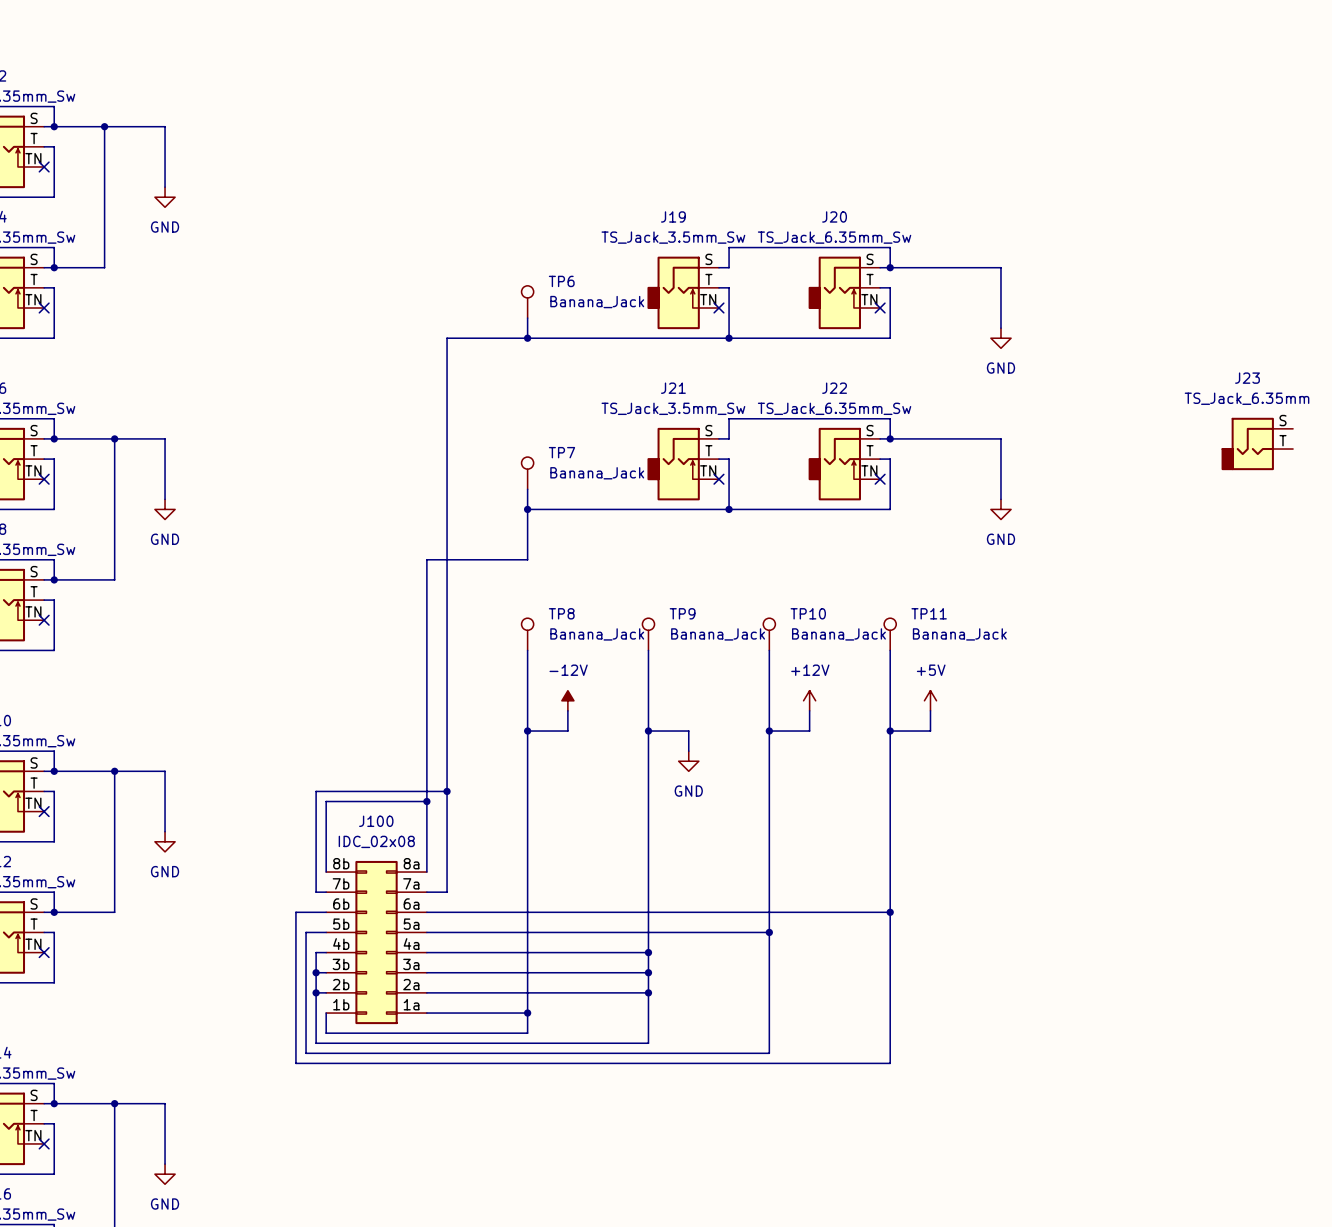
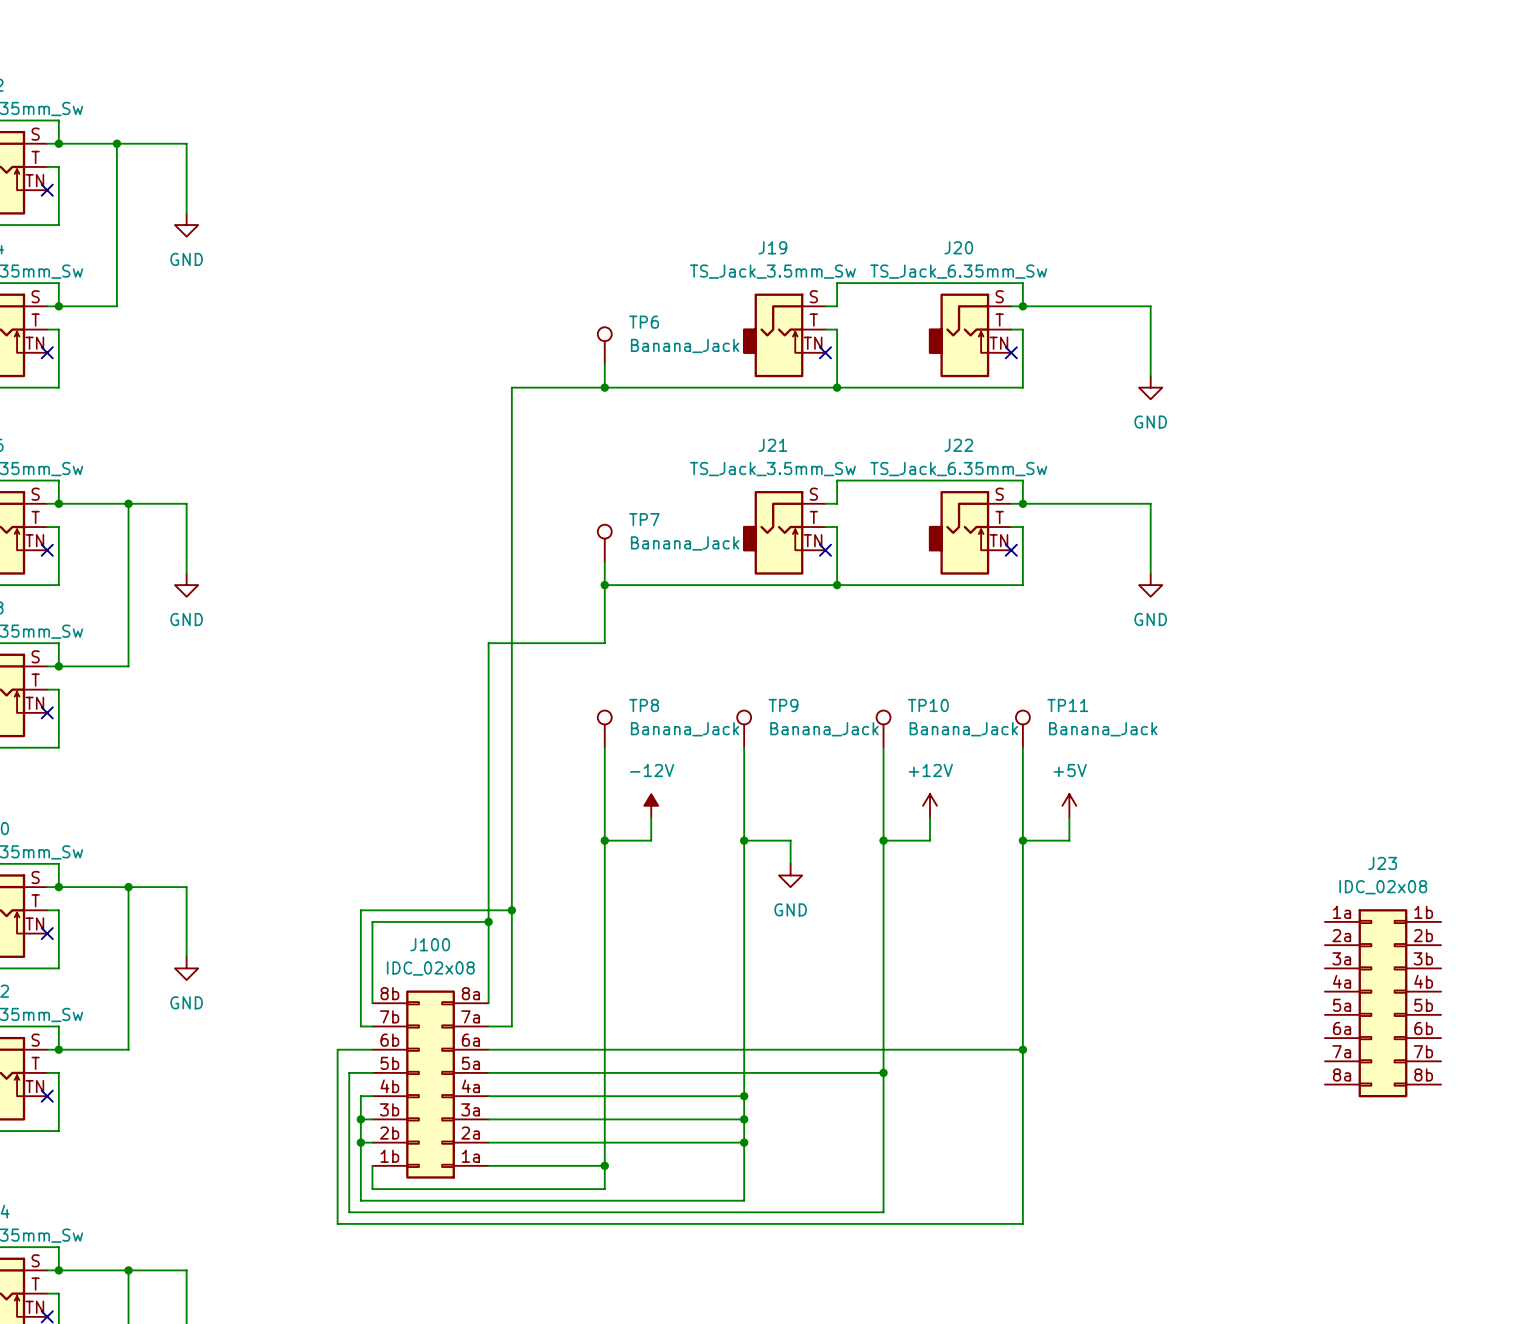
J23 name position: J23 (1247, 378) -> J23 (1382, 863)
J23 value: TS_Jack_6.35mm (1247, 398) -> IDC_02x08 (1383, 887)
J23 symbol: [1221, 417, 1294, 471] -> [1324, 909, 1442, 1098]

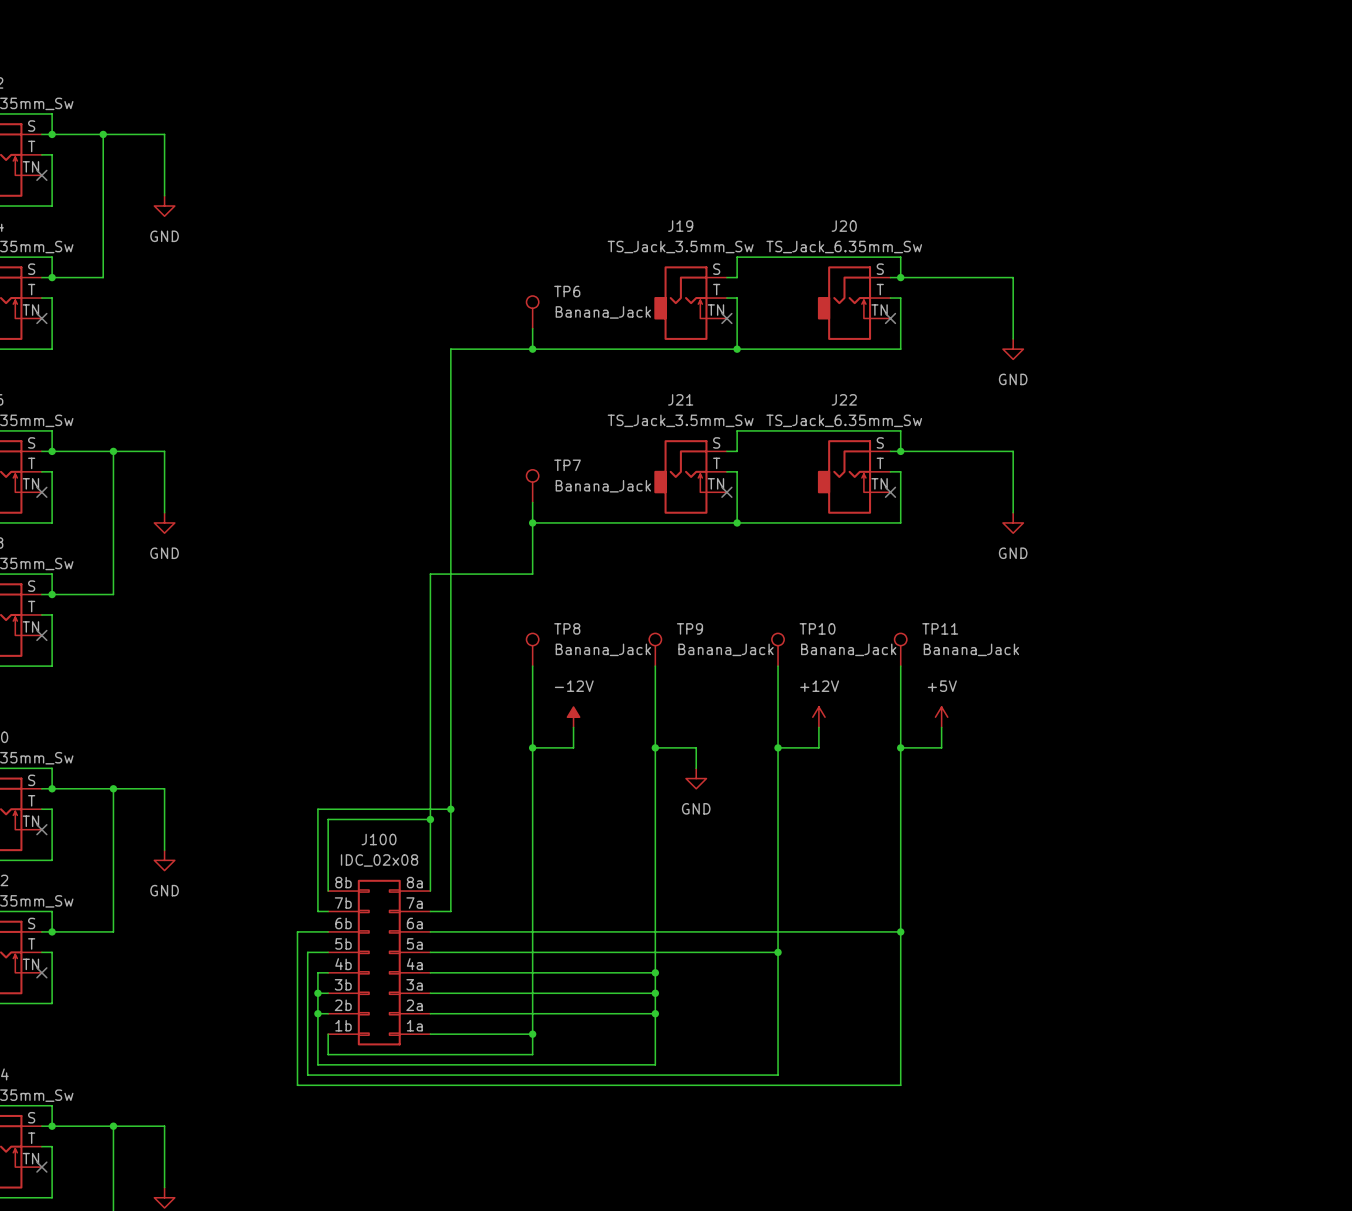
J23: IDC_02x08 (1382, 1003) -> none

